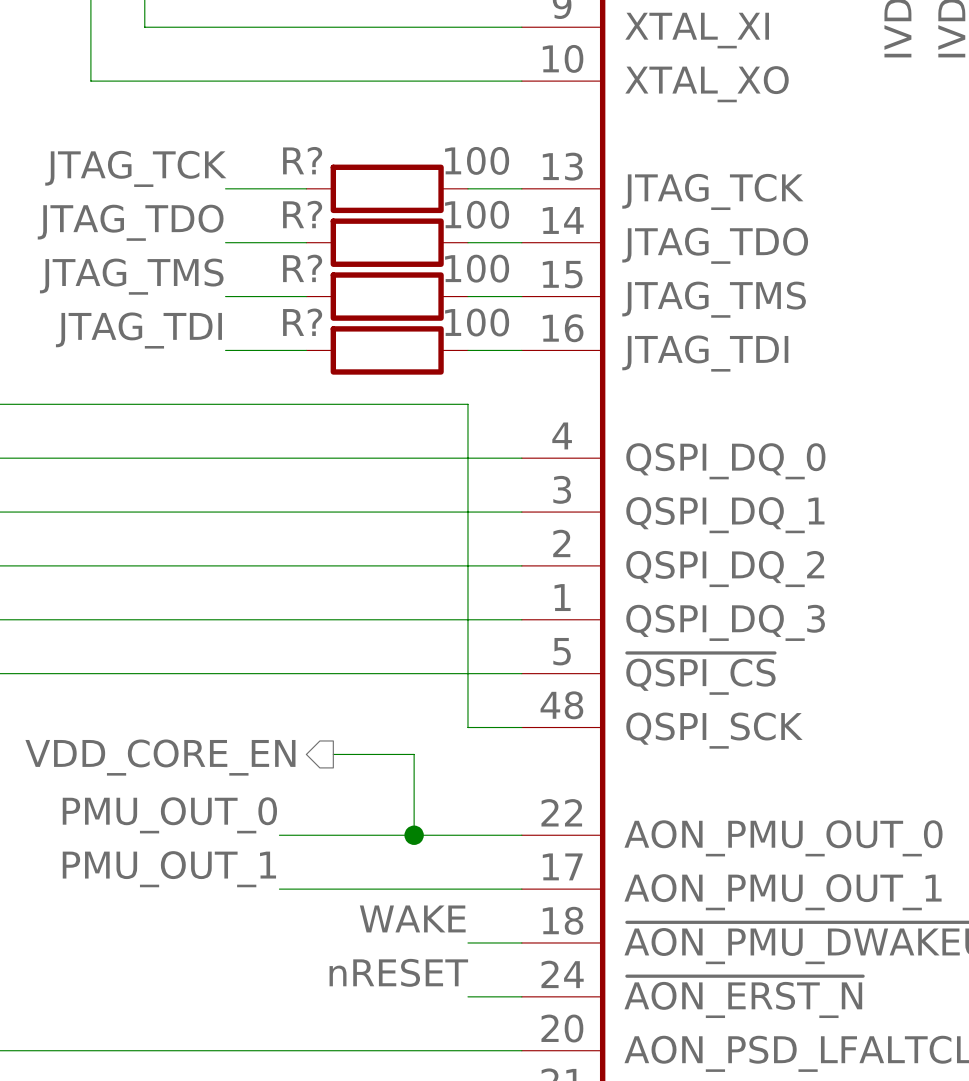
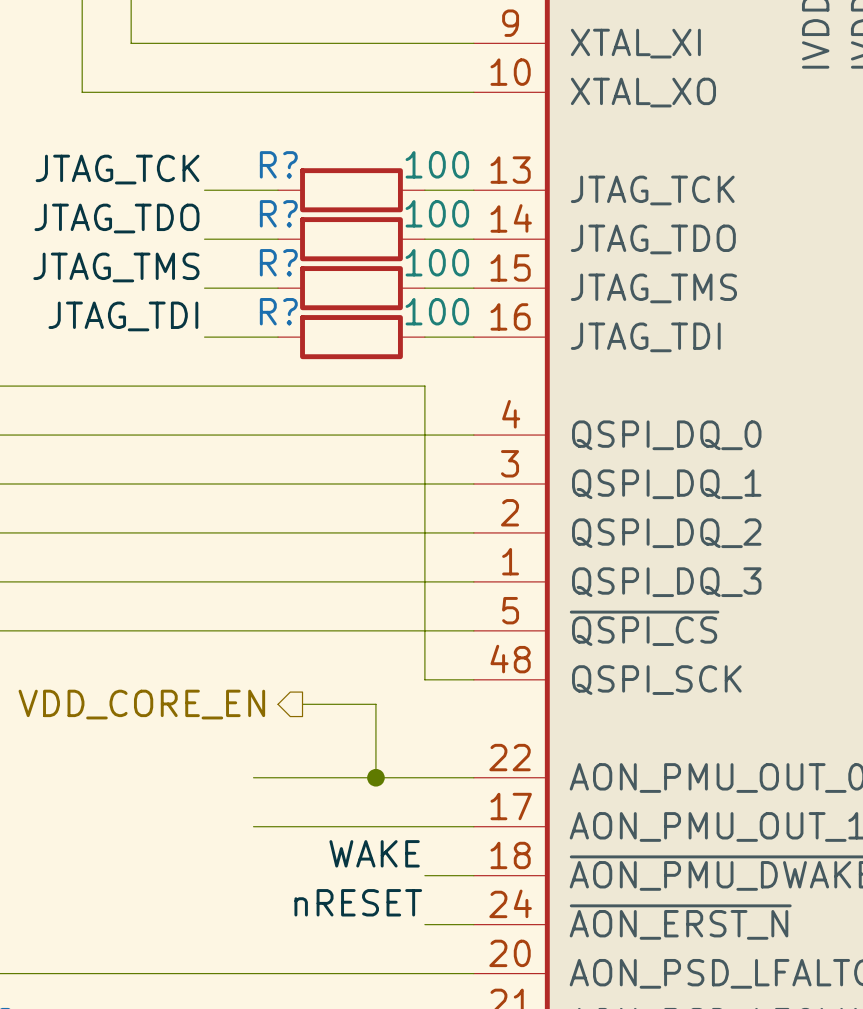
label: PMU_OUT_0 (169, 815) -> none
label: PMU_OUT_1 (169, 869) -> none

